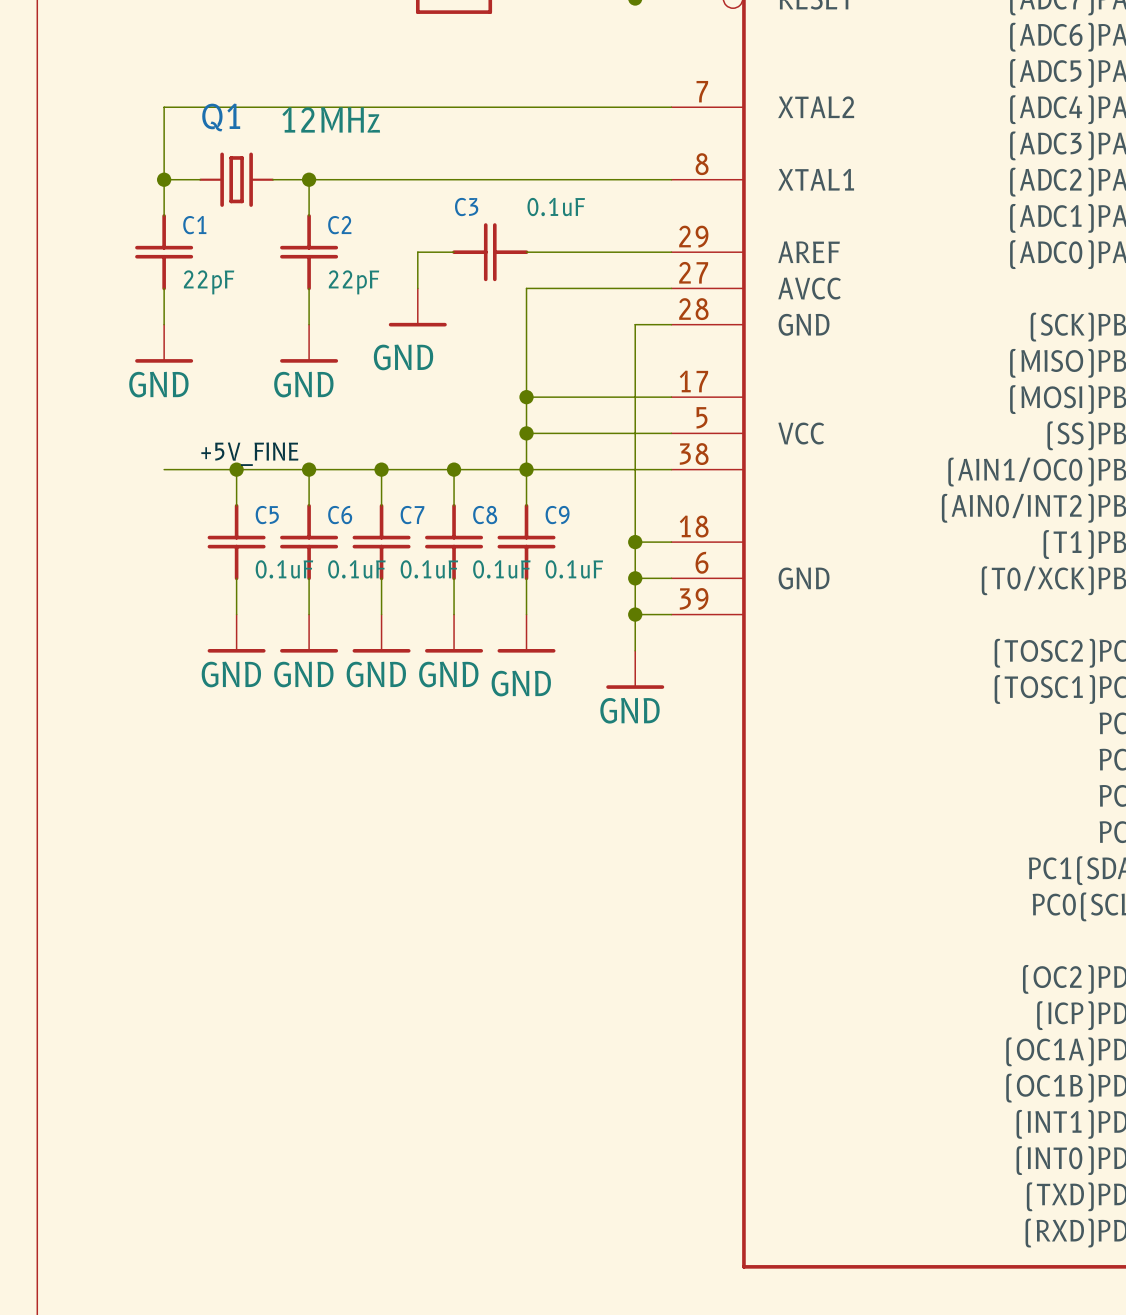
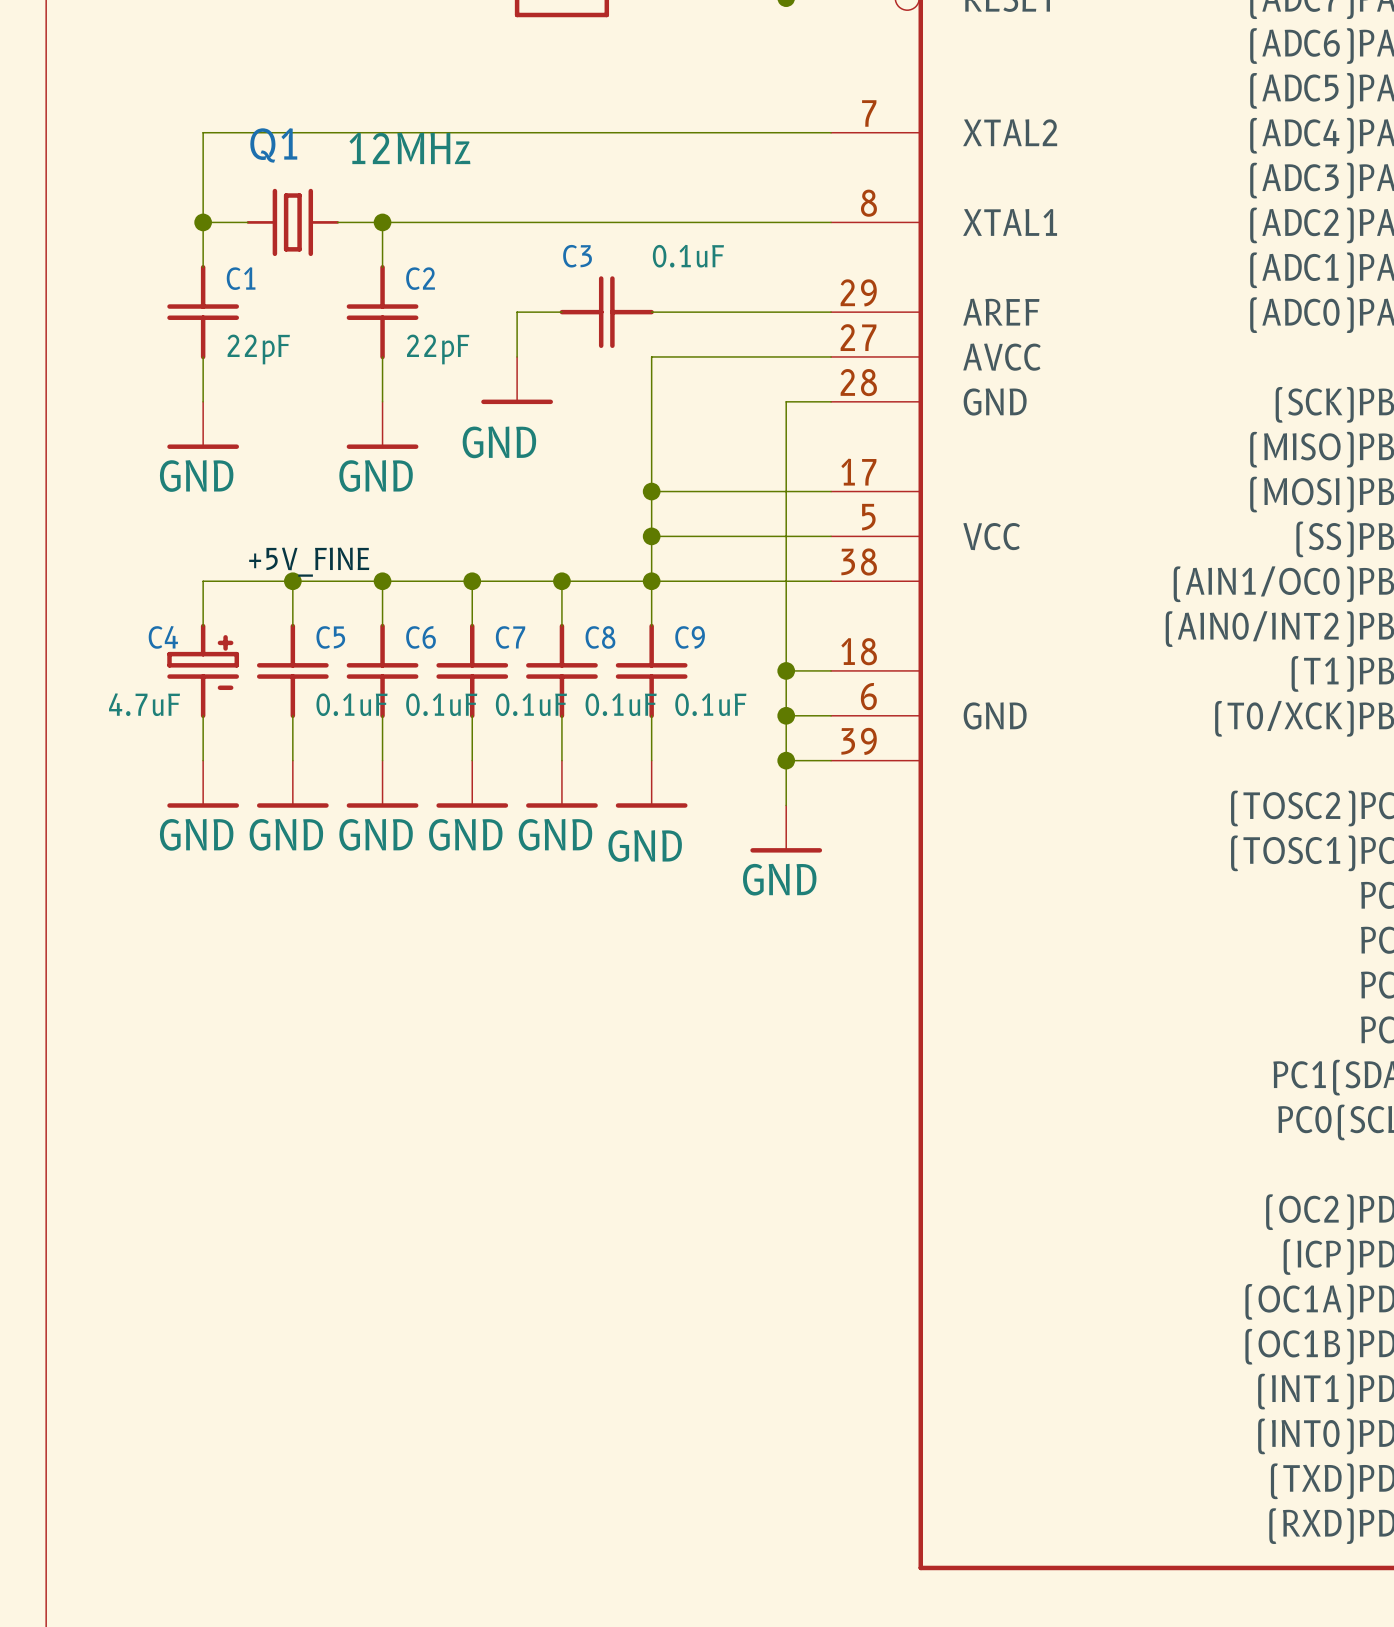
wire: none -> (203, 581) (203, 626)
C4: none -> 4.7uF (203, 670)
wire: none -> (203, 715) (203, 760)
power symbol: none -> GND (203, 784)

